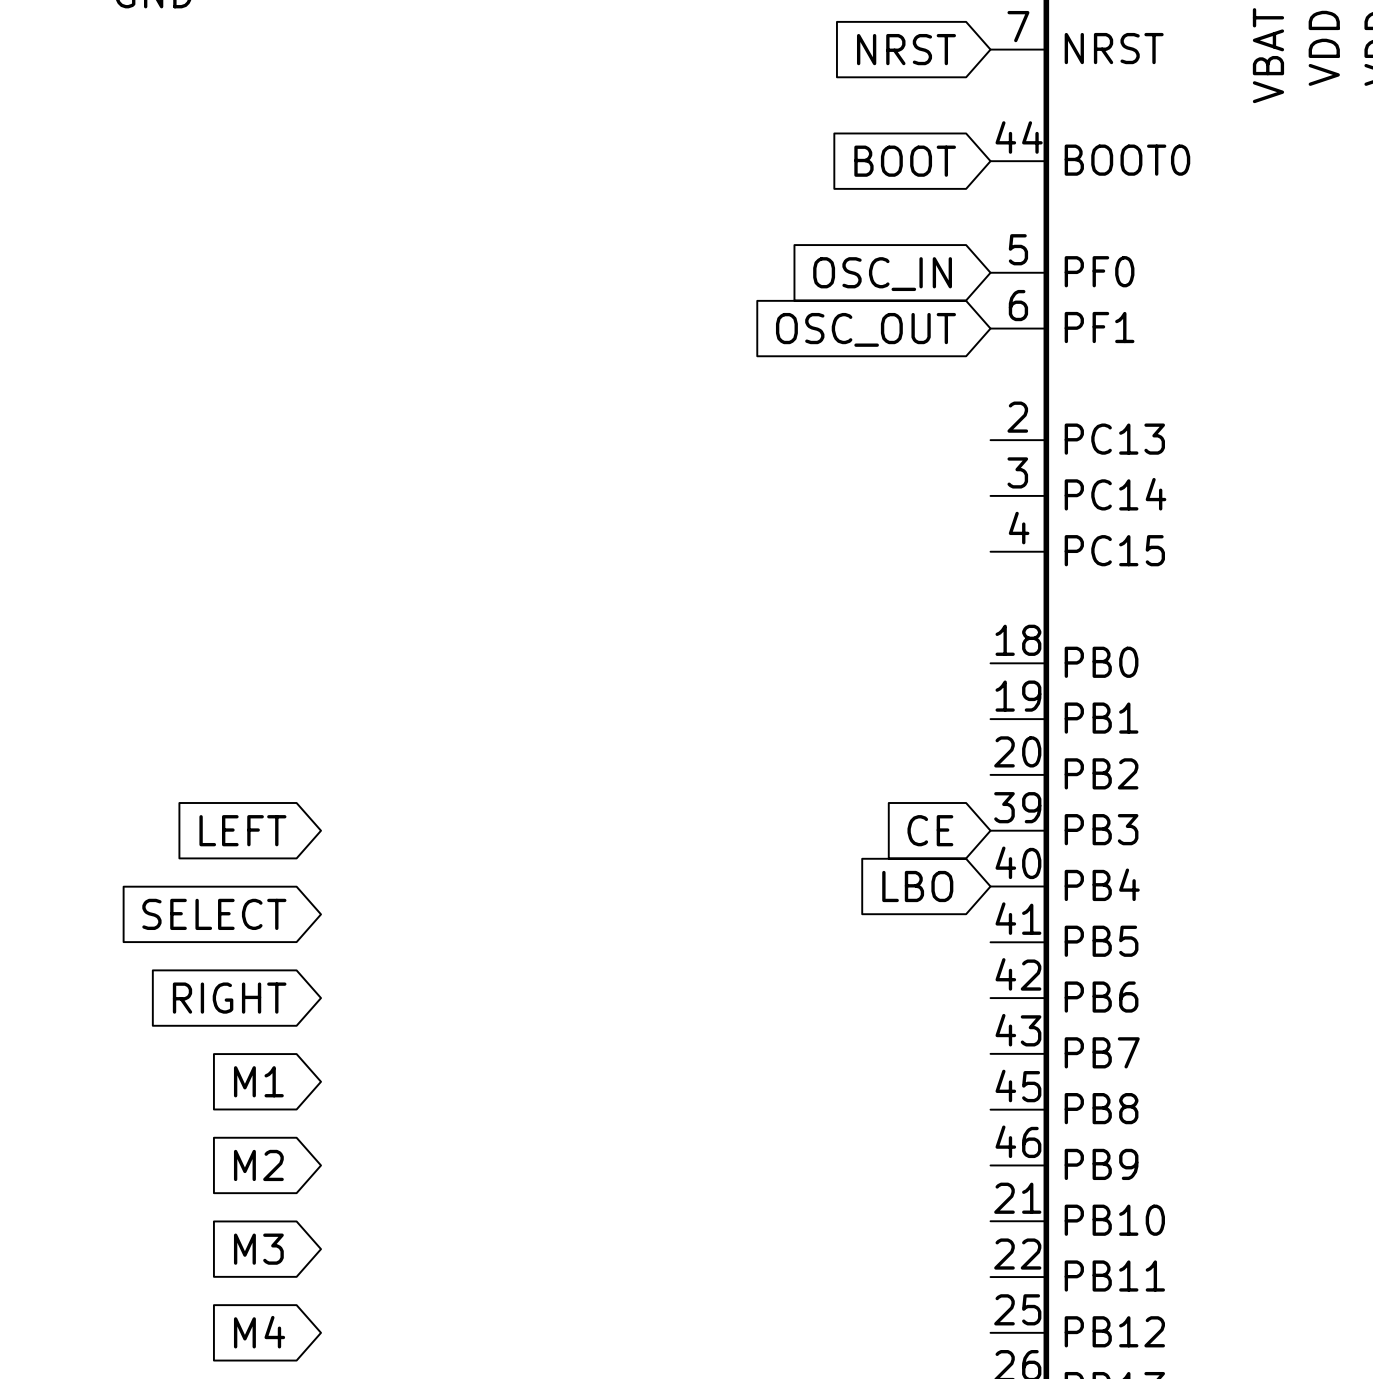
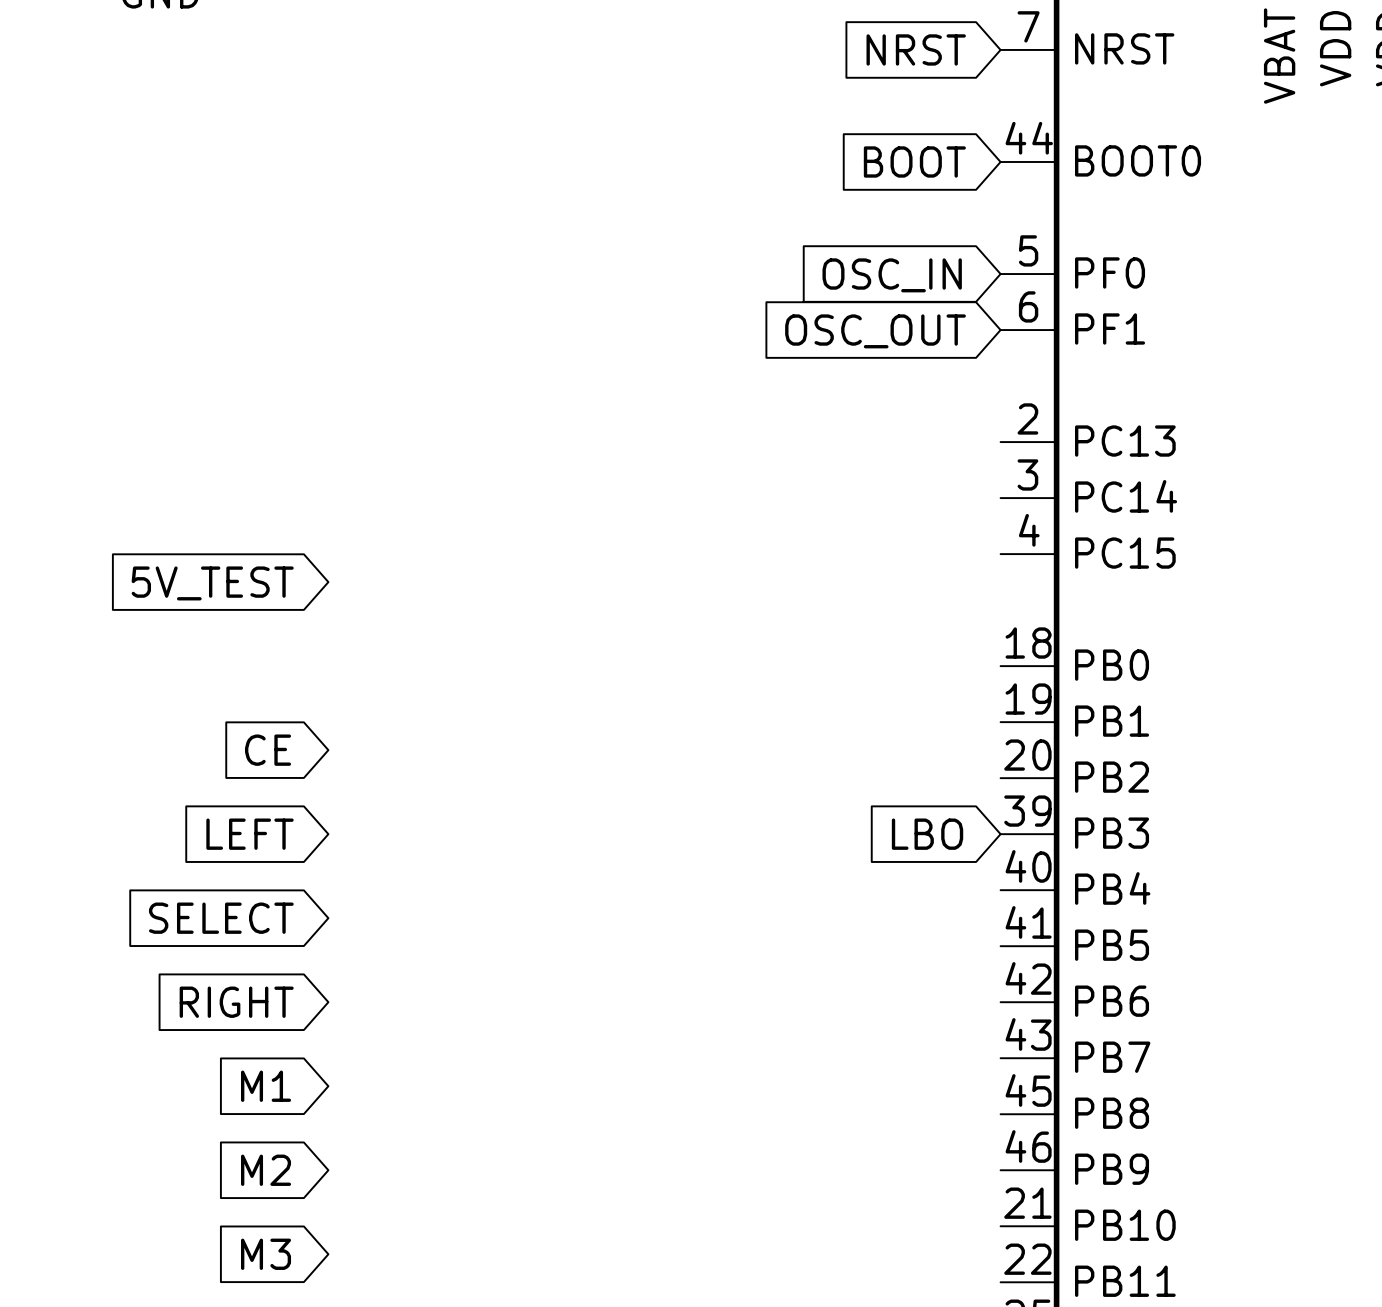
global label: none -> 5V_TEST (212, 583)
global label: none -> CE (268, 750)
global label: CE (930, 830) -> LBO (927, 834)
global label: LBO (917, 886) -> none

